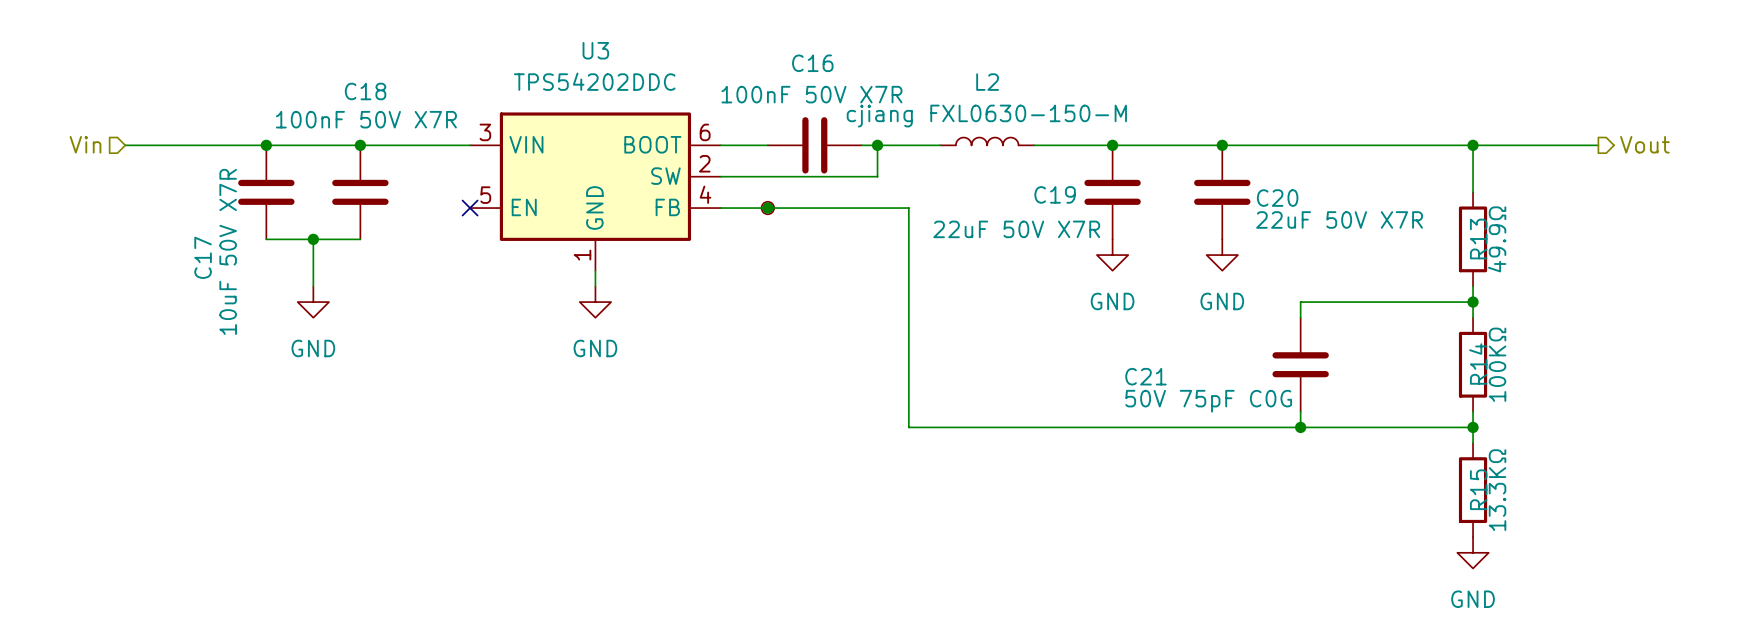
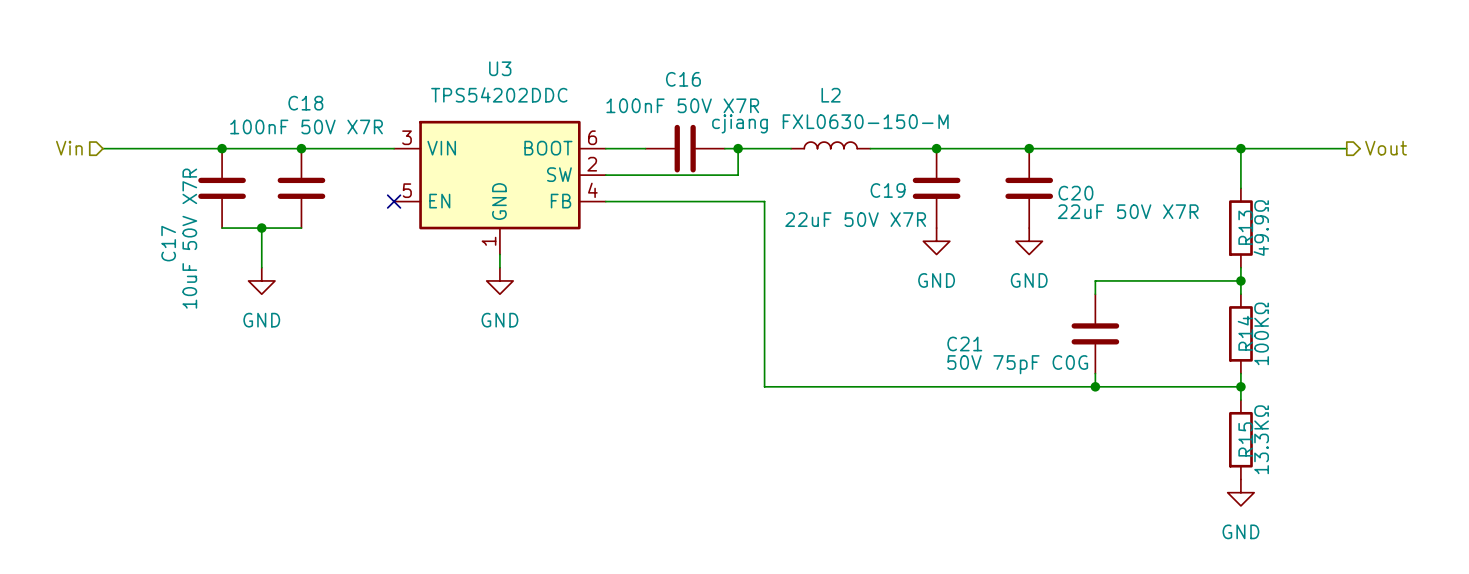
junction: (767, 208) -> none
part: (767, 208) -> none

